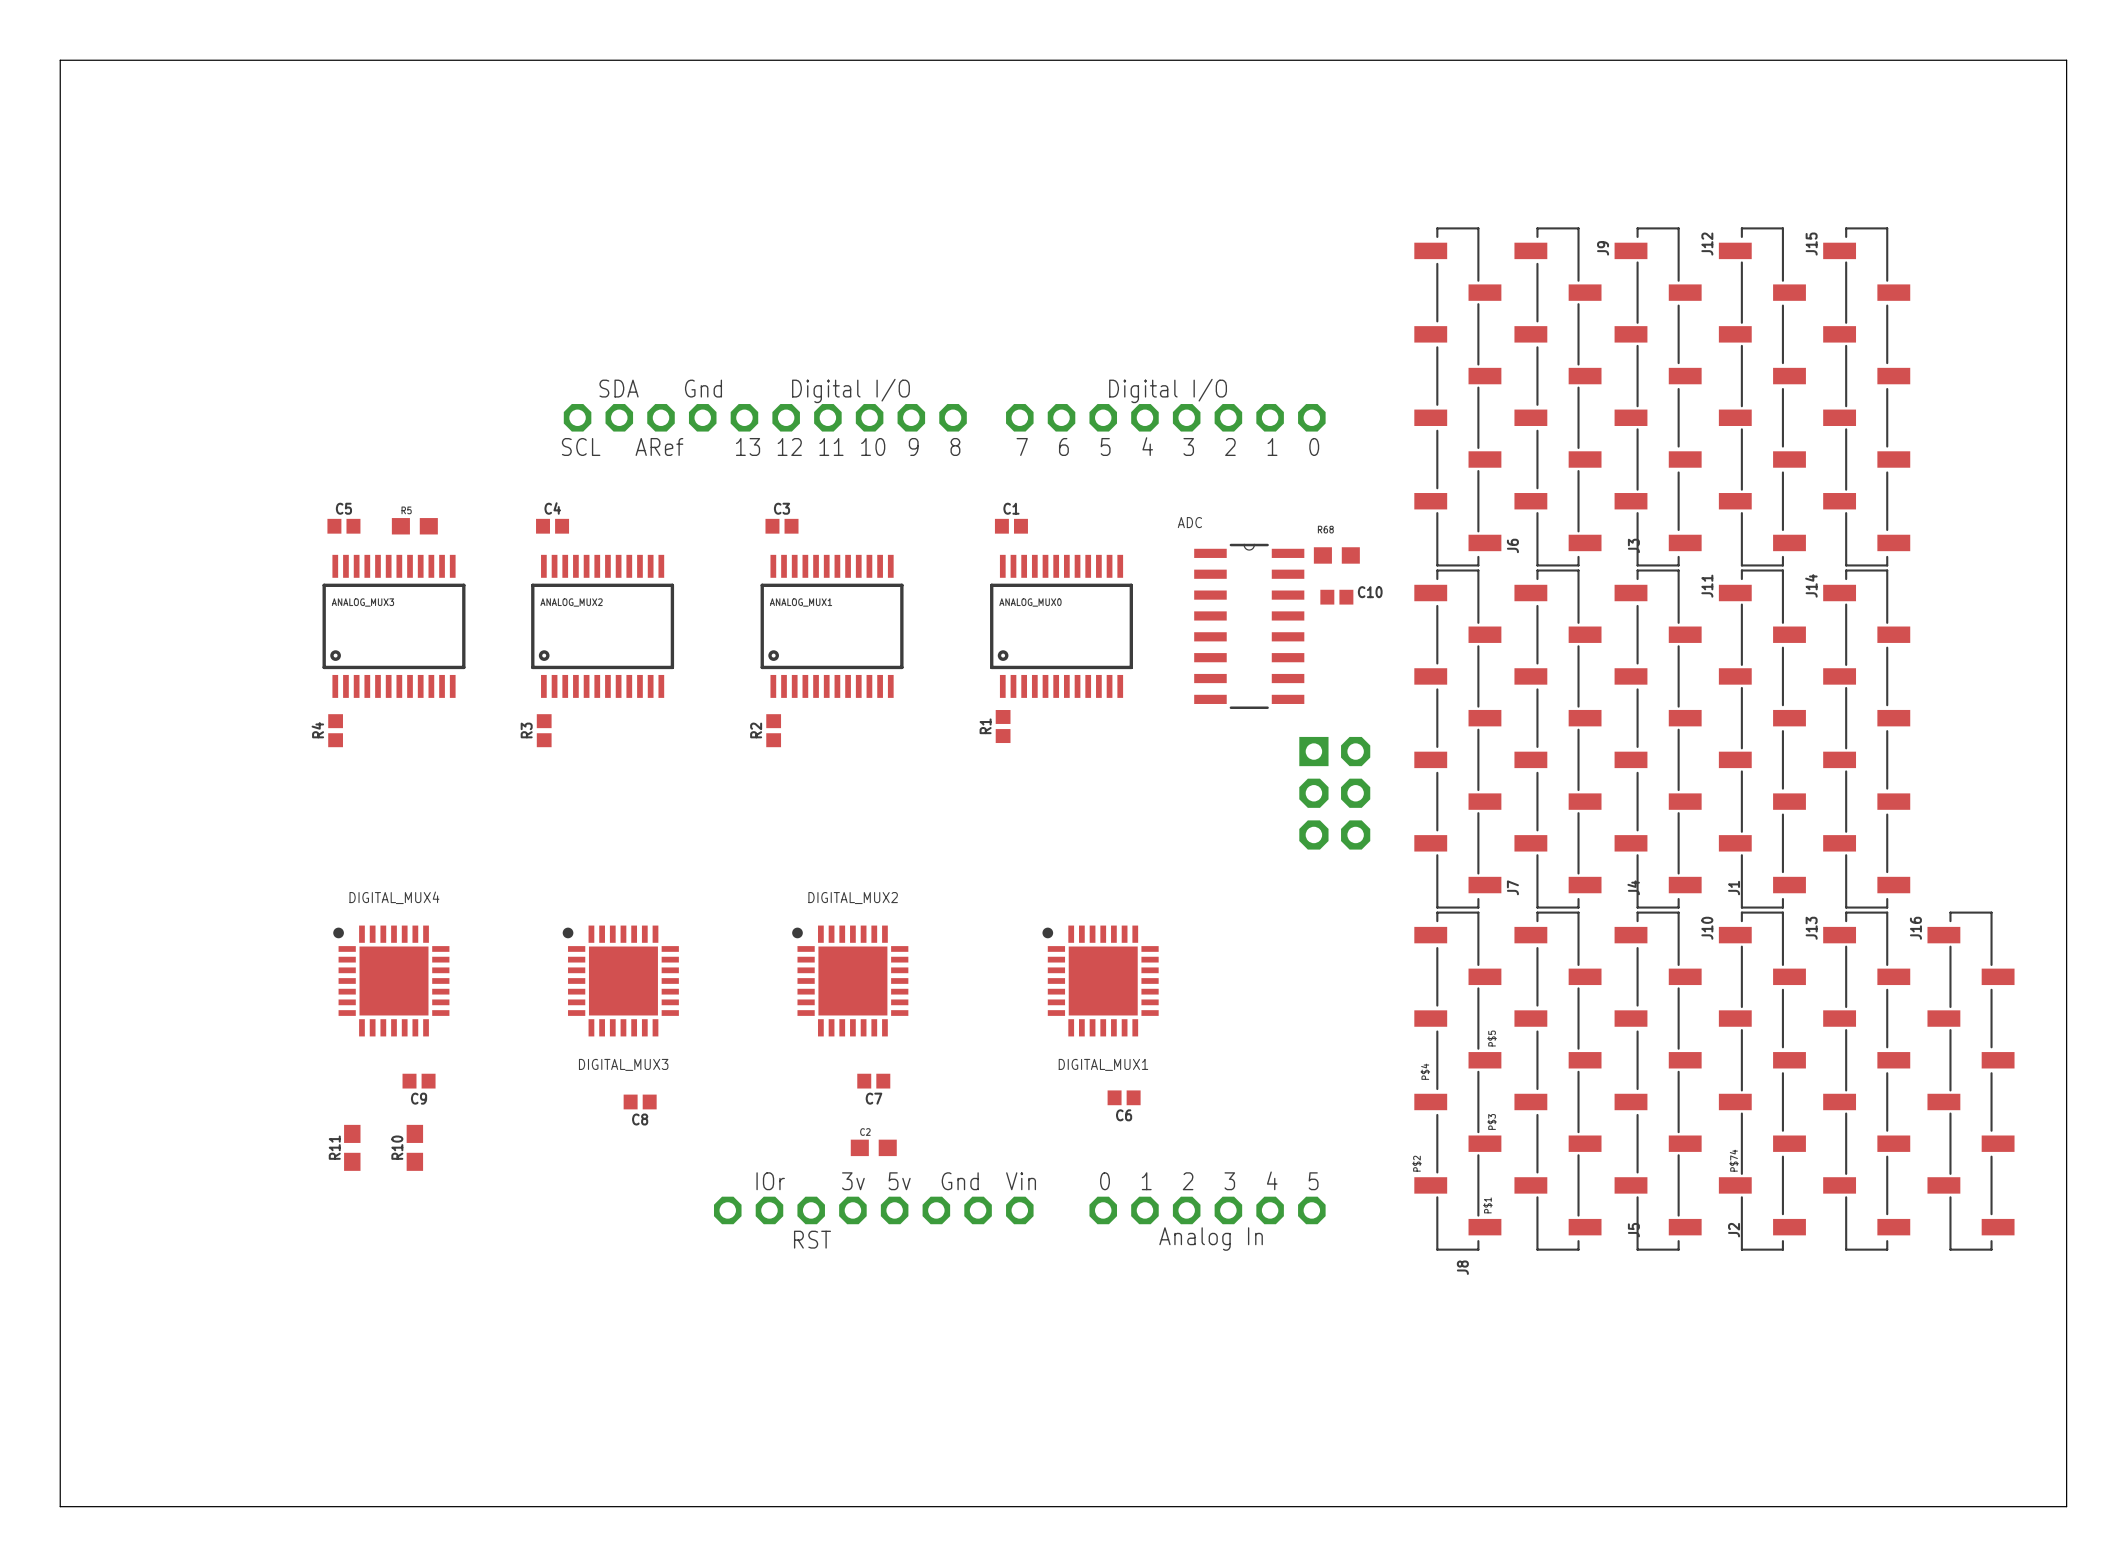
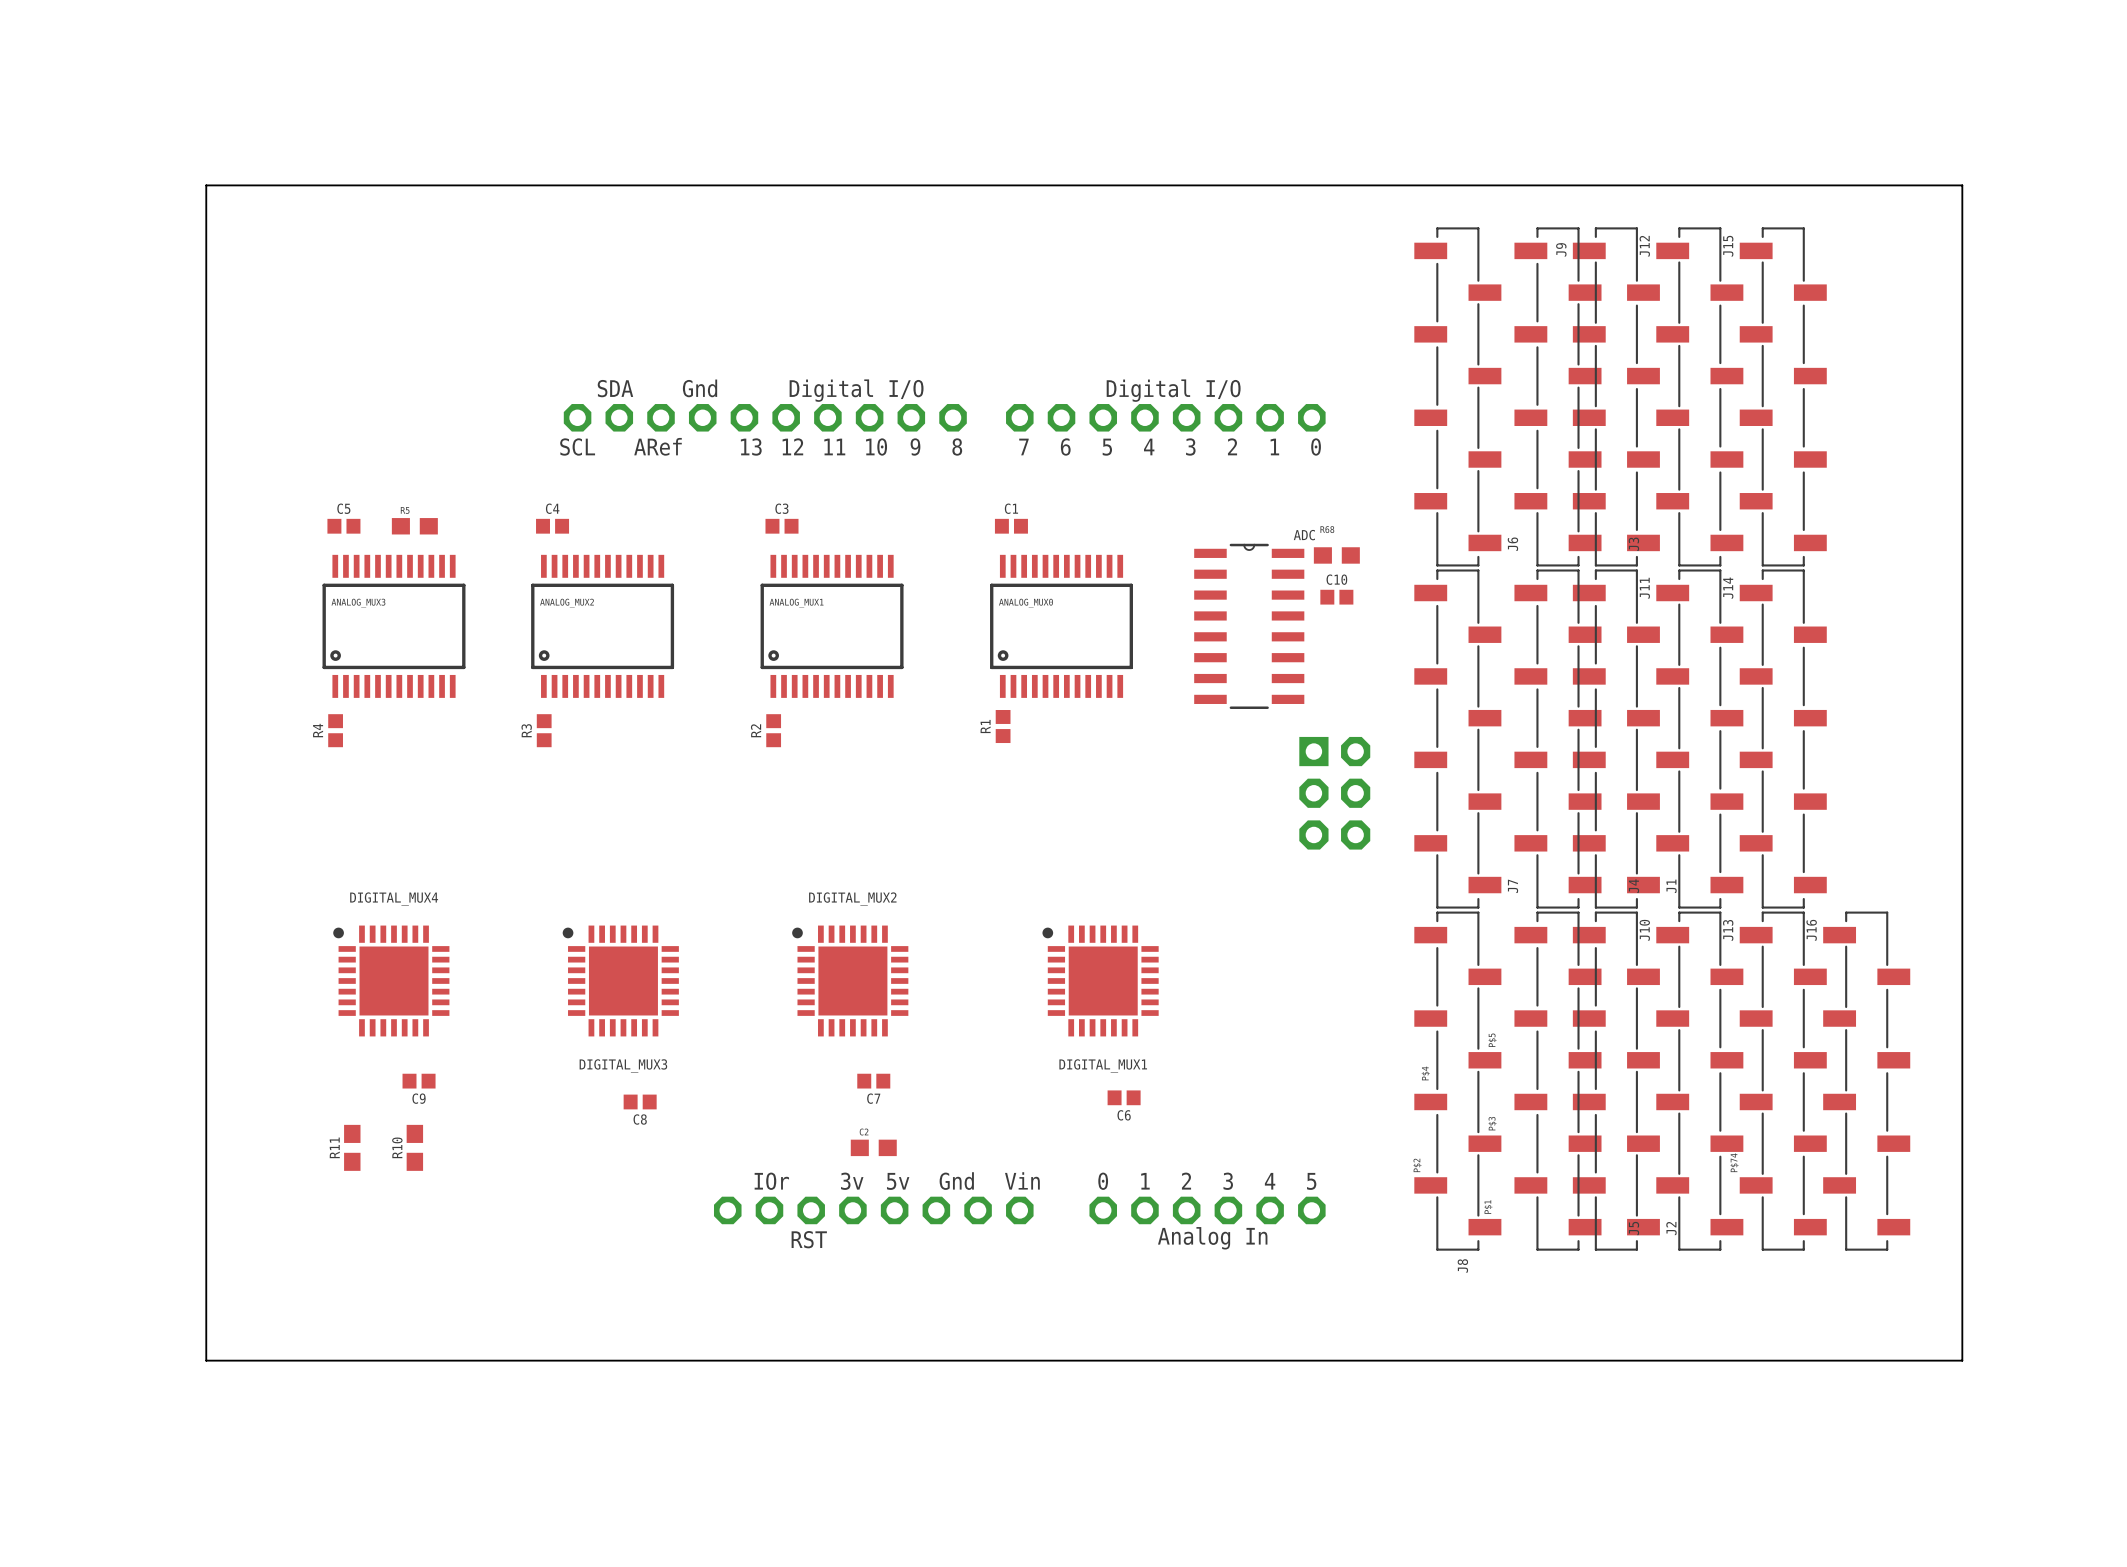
board edge: (60, 60) (2066, 60) (2066, 1506) (60, 1506) (60, 60) -> (206, 185) (206, 1360) (1962, 1360) (1962, 185) (206, 185)
J9 position: (1658, 396) -> (1616, 396)
J12 position: (1762, 396) -> (1699, 396)
J15 position: (1866, 396) -> (1783, 396)
ADC name position: ADC (1189, 522) -> ADC (1304, 535)
C10 name position: C10 (1370, 592) -> C10 (1336, 579)
J1 position: (1658, 739) -> (1616, 739)
J11 position: (1762, 739) -> (1699, 739)
J14 position: (1866, 739) -> (1783, 739)
J1 name position: J1 (1734, 888) -> J1 (1671, 886)
J13 name: J13 (1811, 928) -> J16 (1811, 930)
J2 position: (1658, 1081) -> (1616, 1081)
J10 position: (1762, 1081) -> (1699, 1081)
J13: none -> (1783, 1081)
J16: (1971, 1081) -> none
J2 name position: J2 (1734, 1230) -> J2 (1671, 1228)

